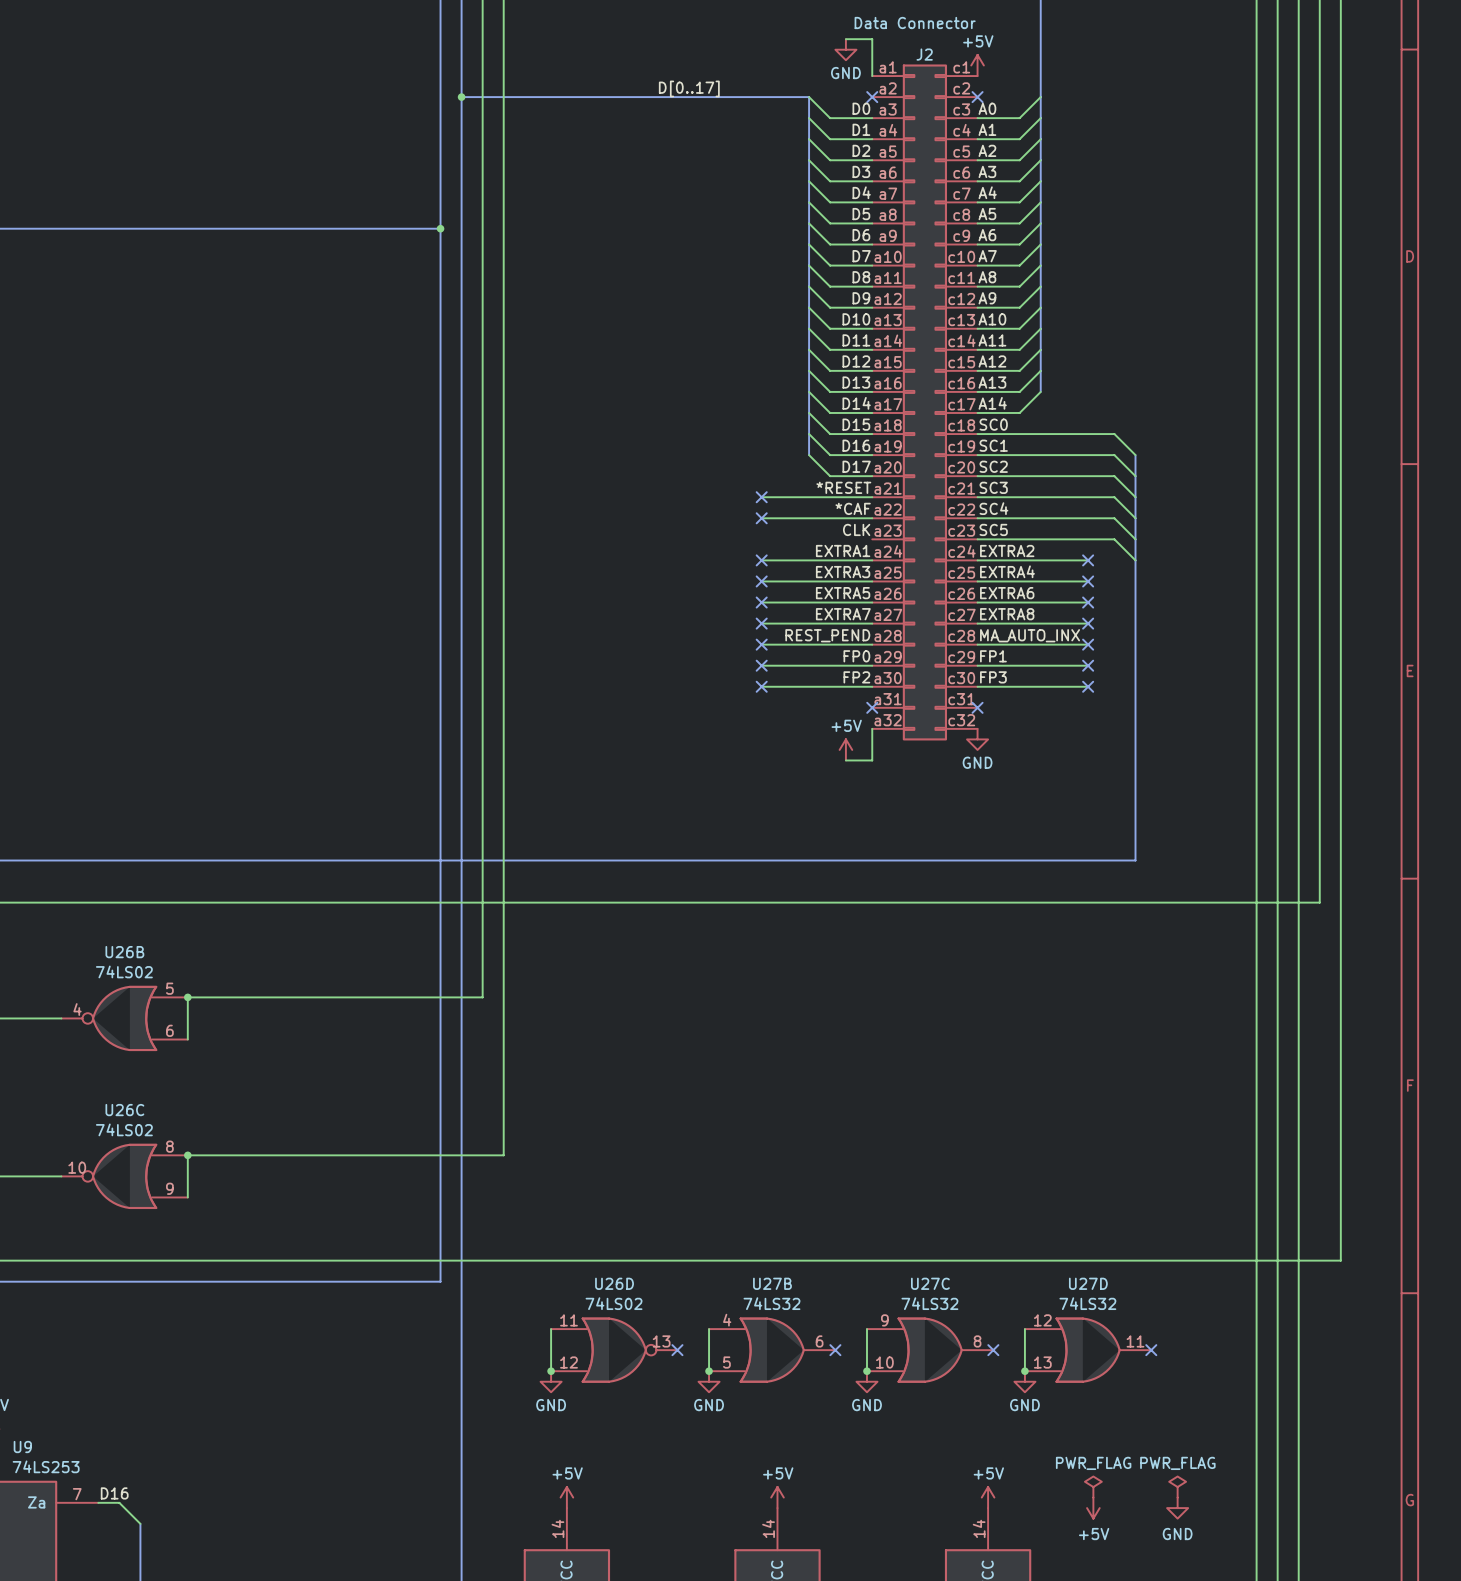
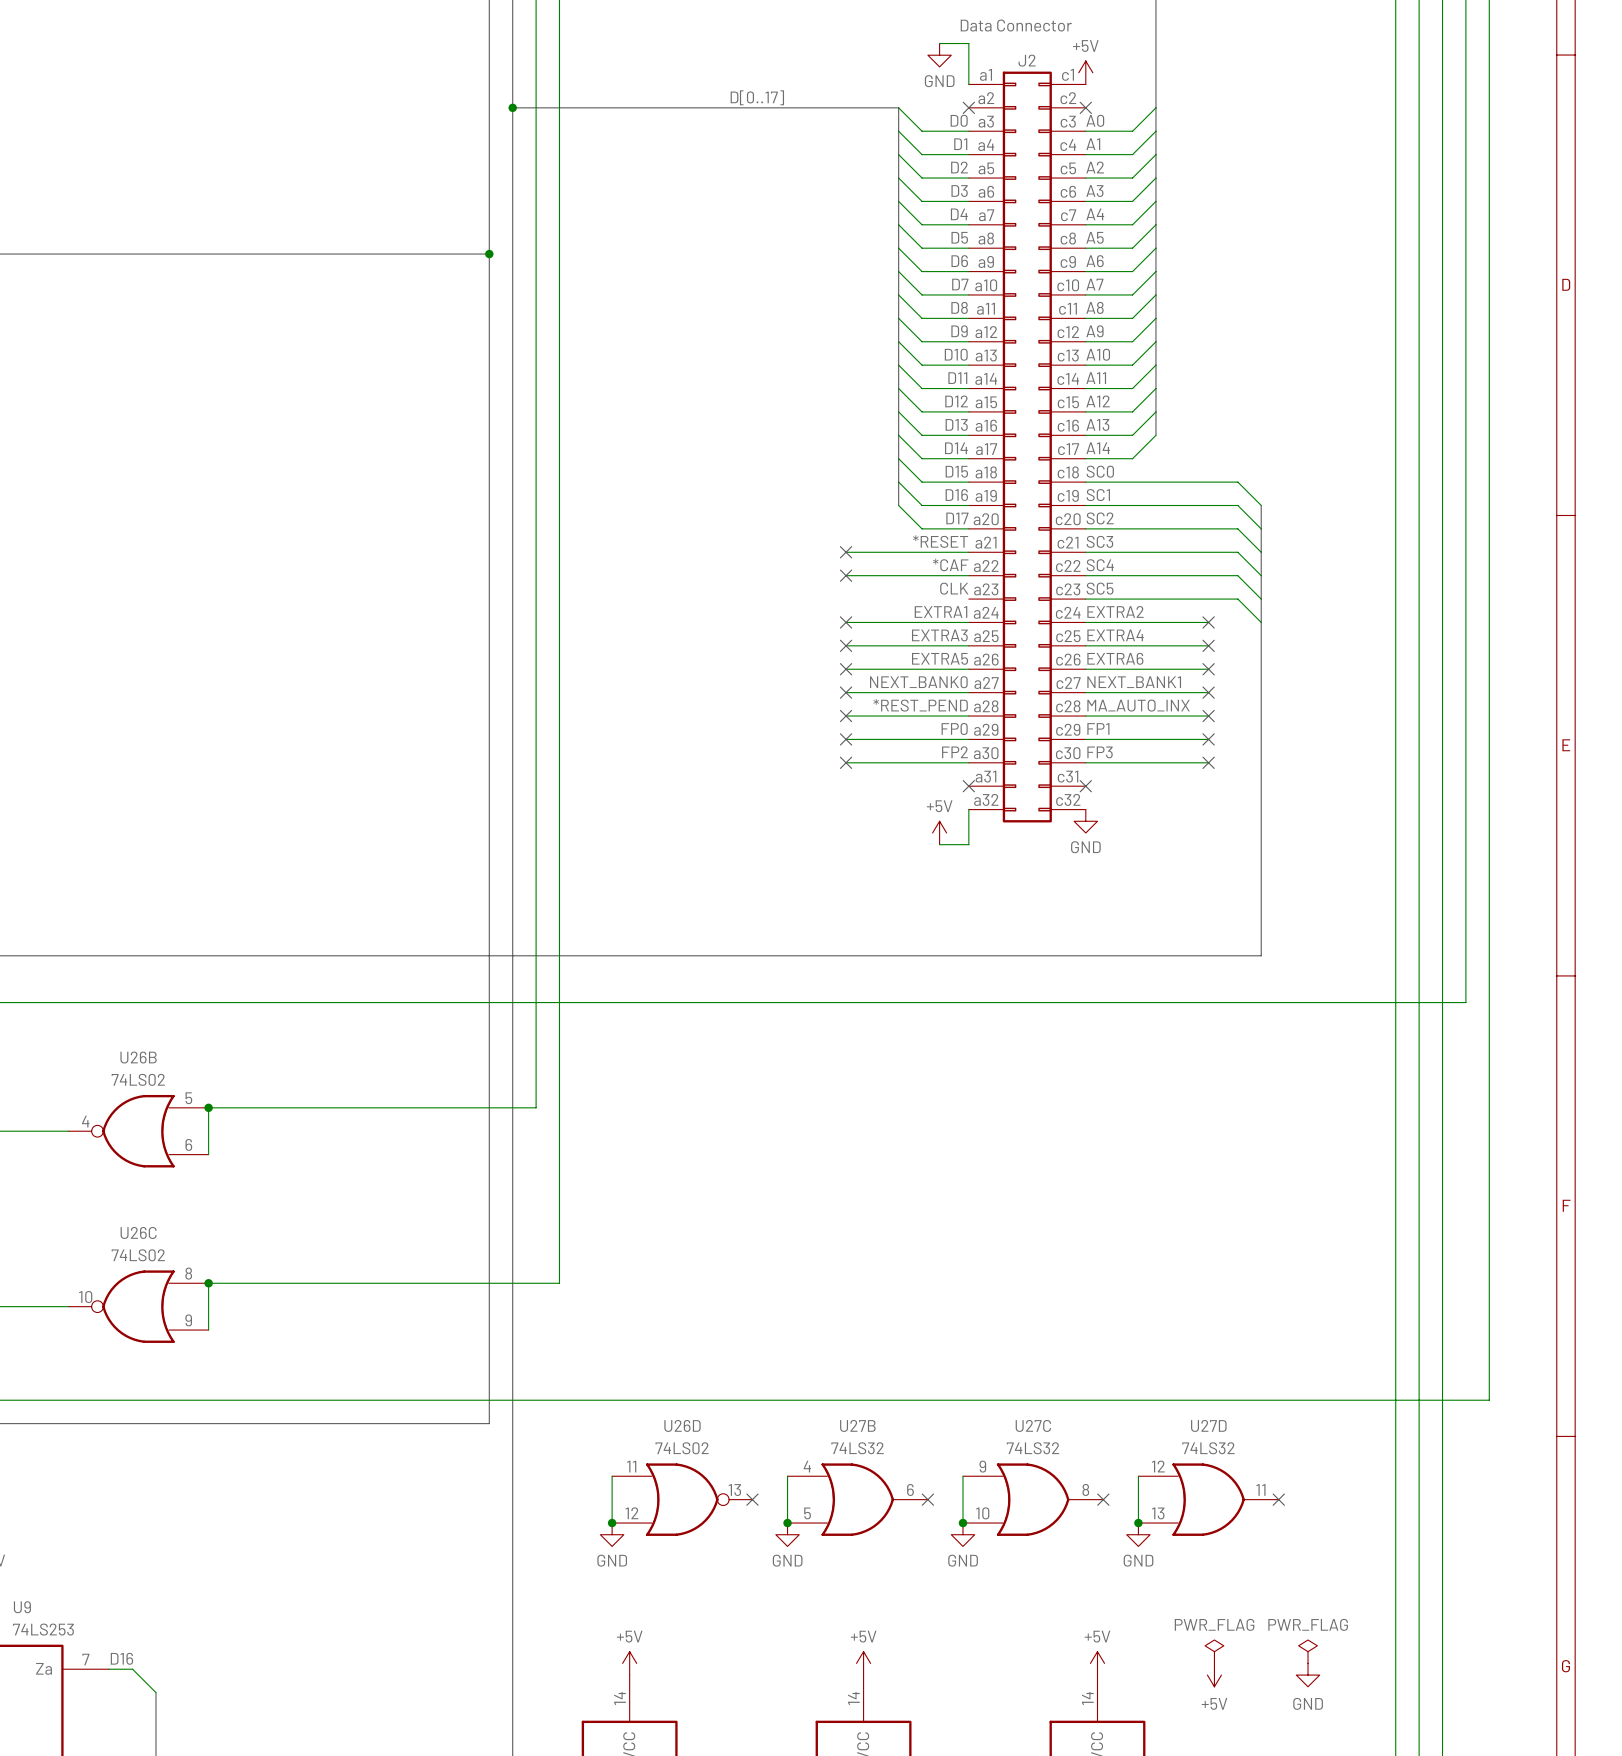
label: EXTRA7 (843, 614) -> NEXT_BANK0 (918, 682)
label: EXTRA8 (1007, 614) -> NEXT_BANK1 (1134, 682)
label: REST_PEND (827, 635) -> *REST_PEND (920, 705)

